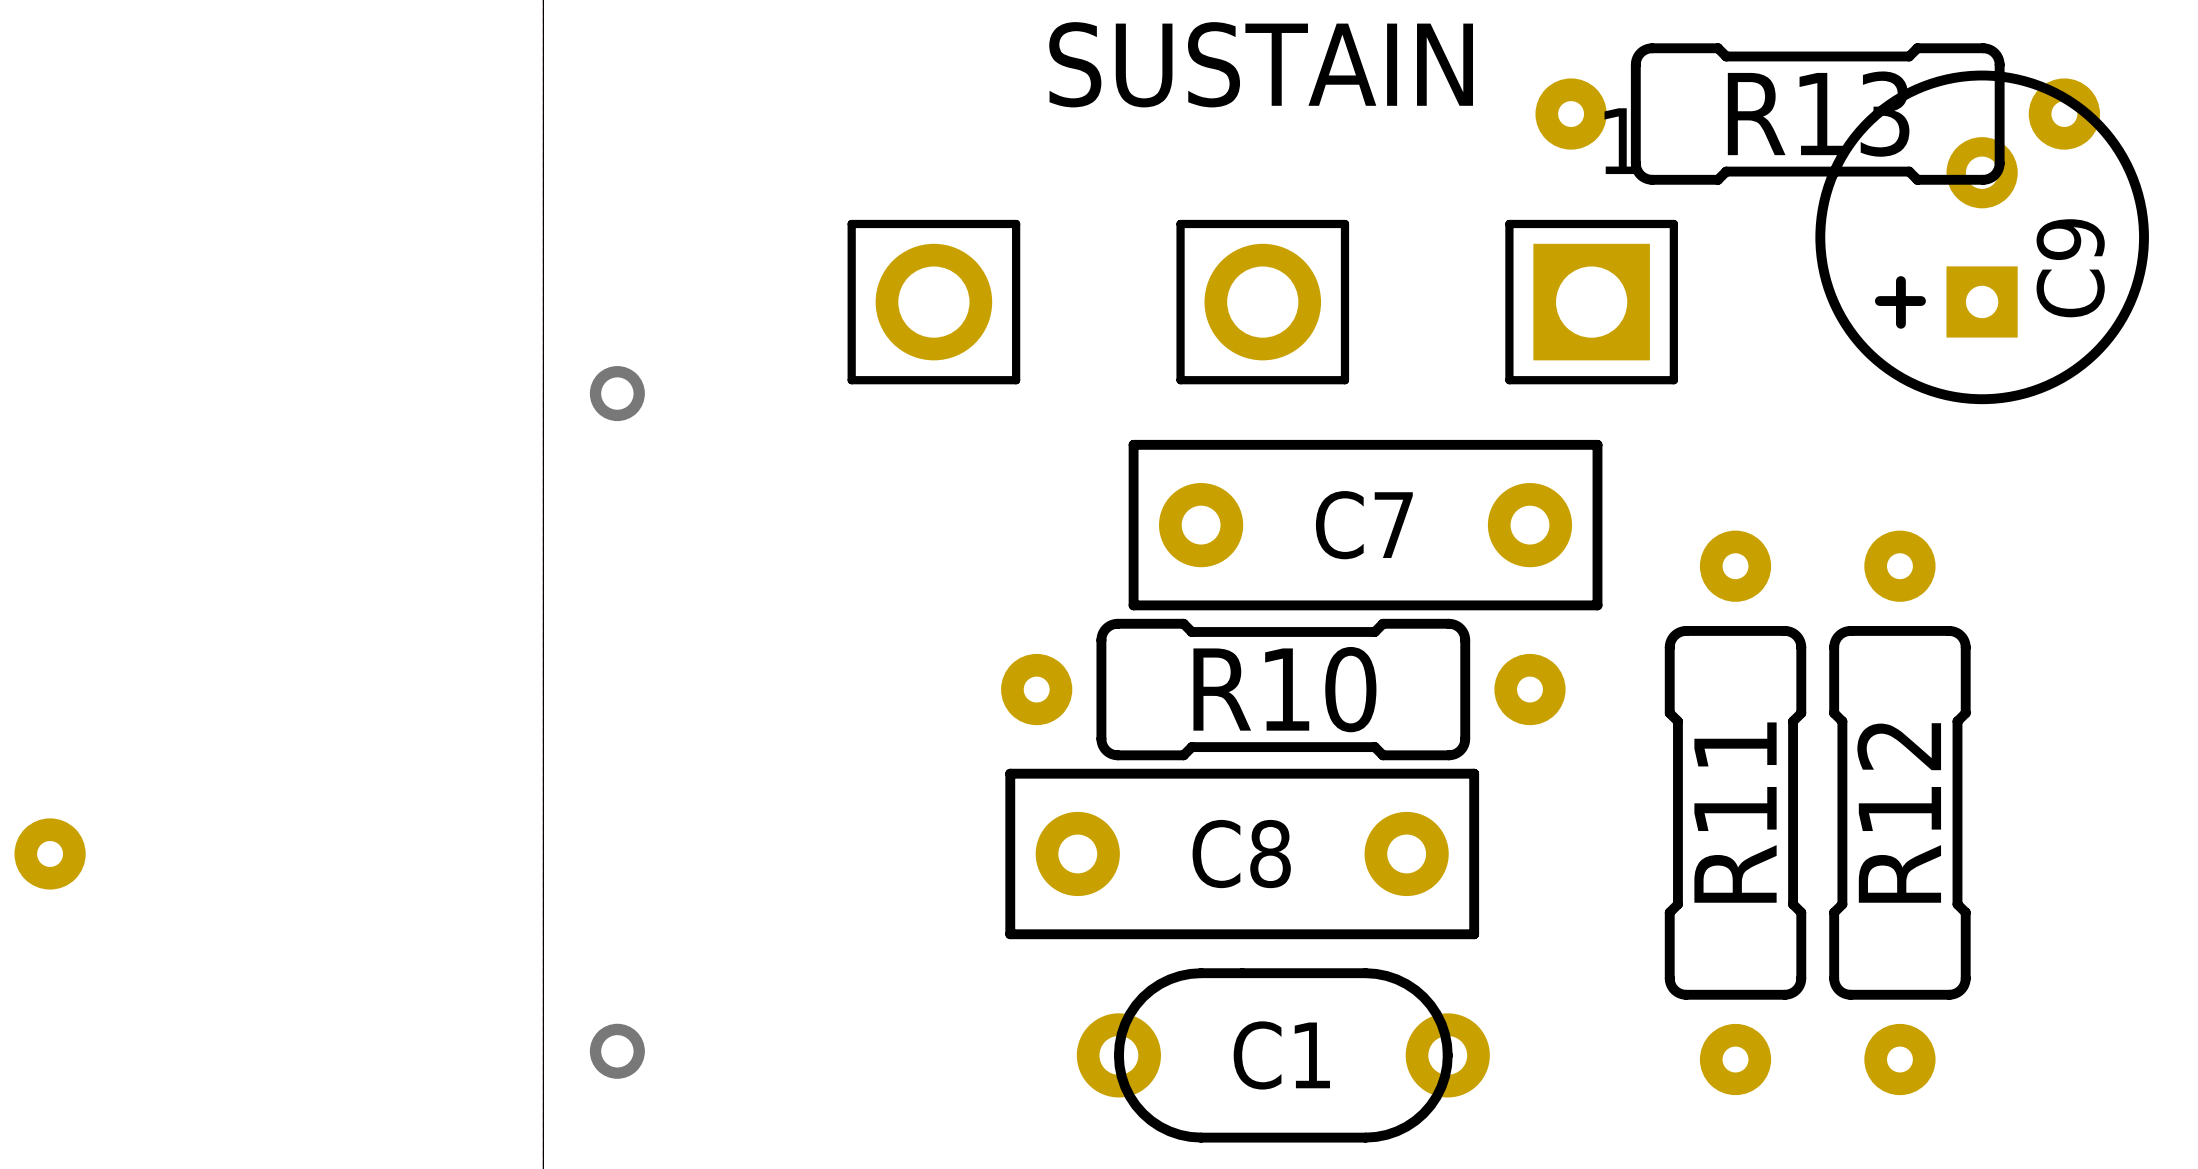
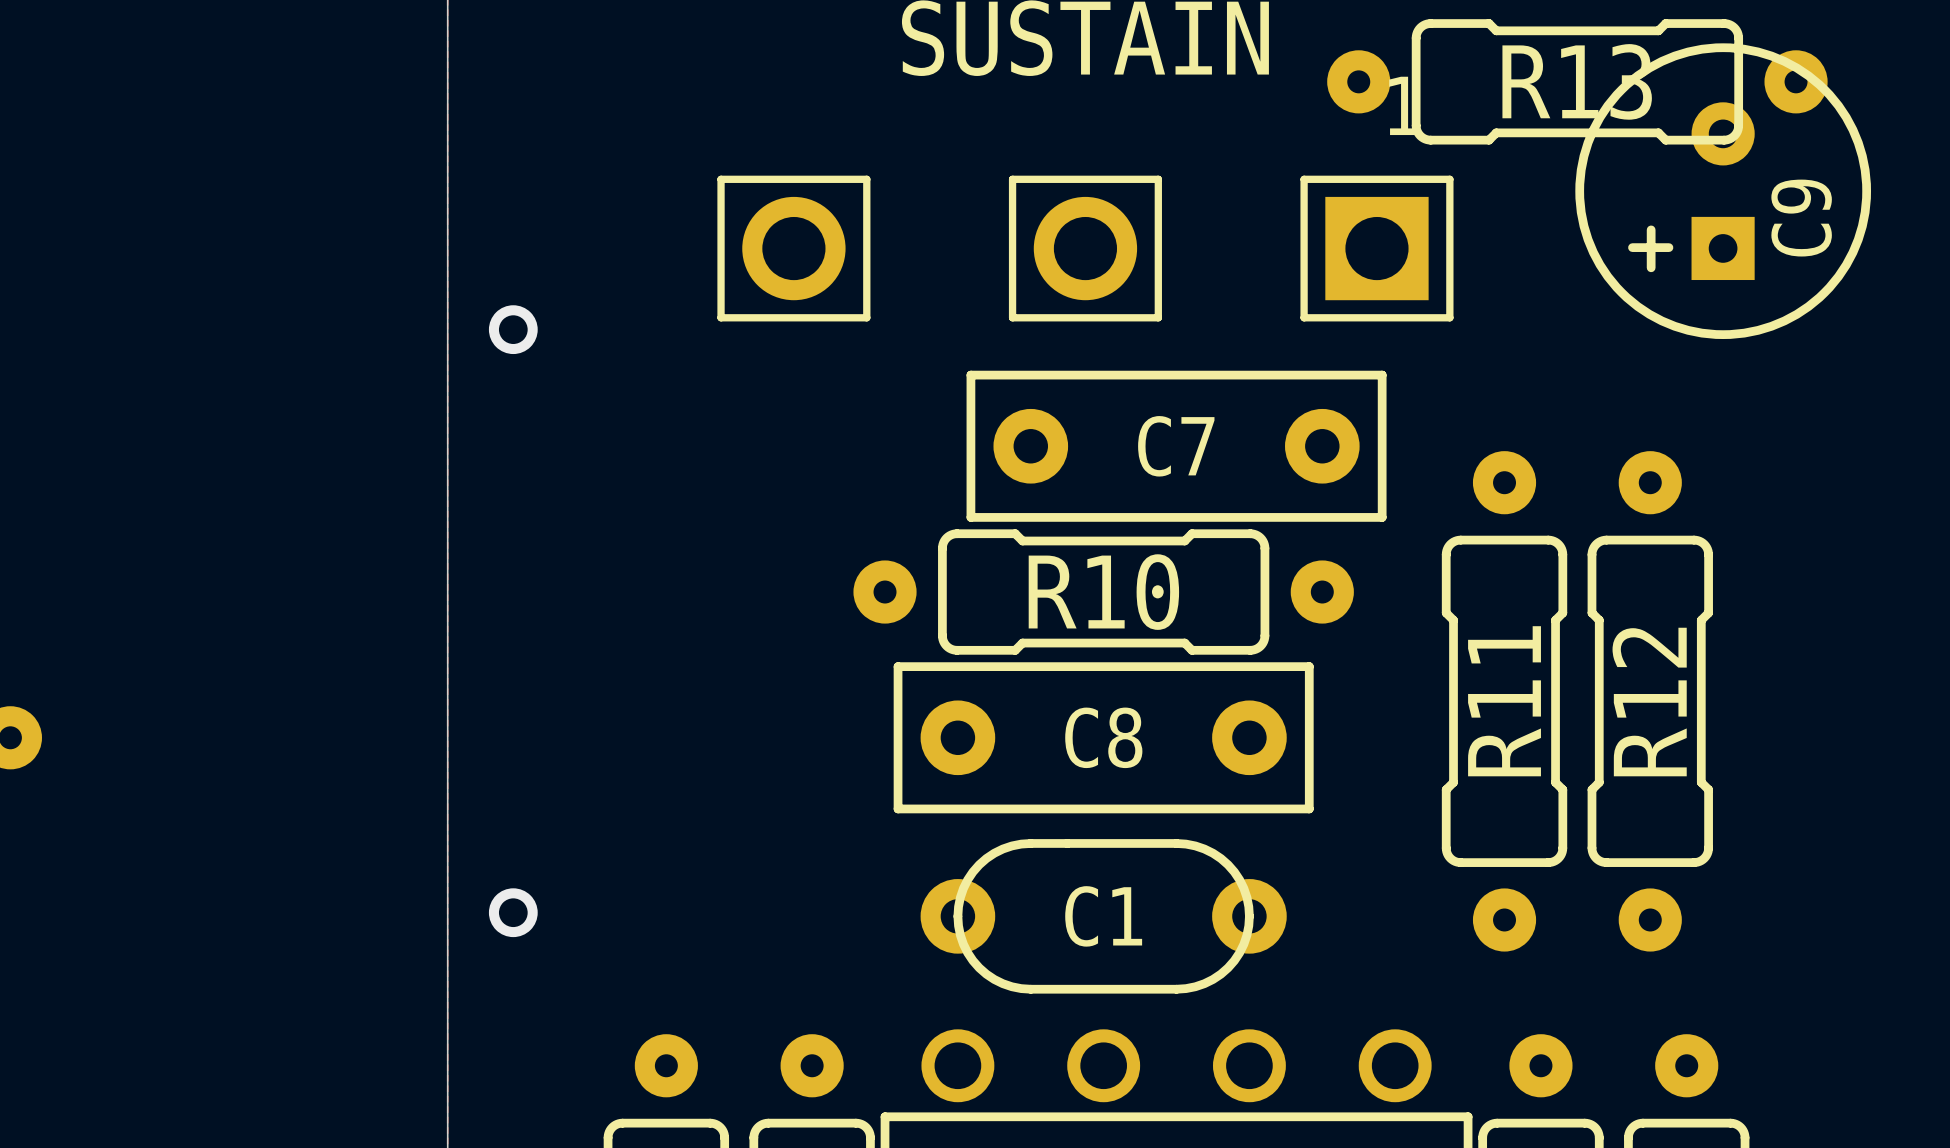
C8 position: (1242, 853) -> (1103, 737)

